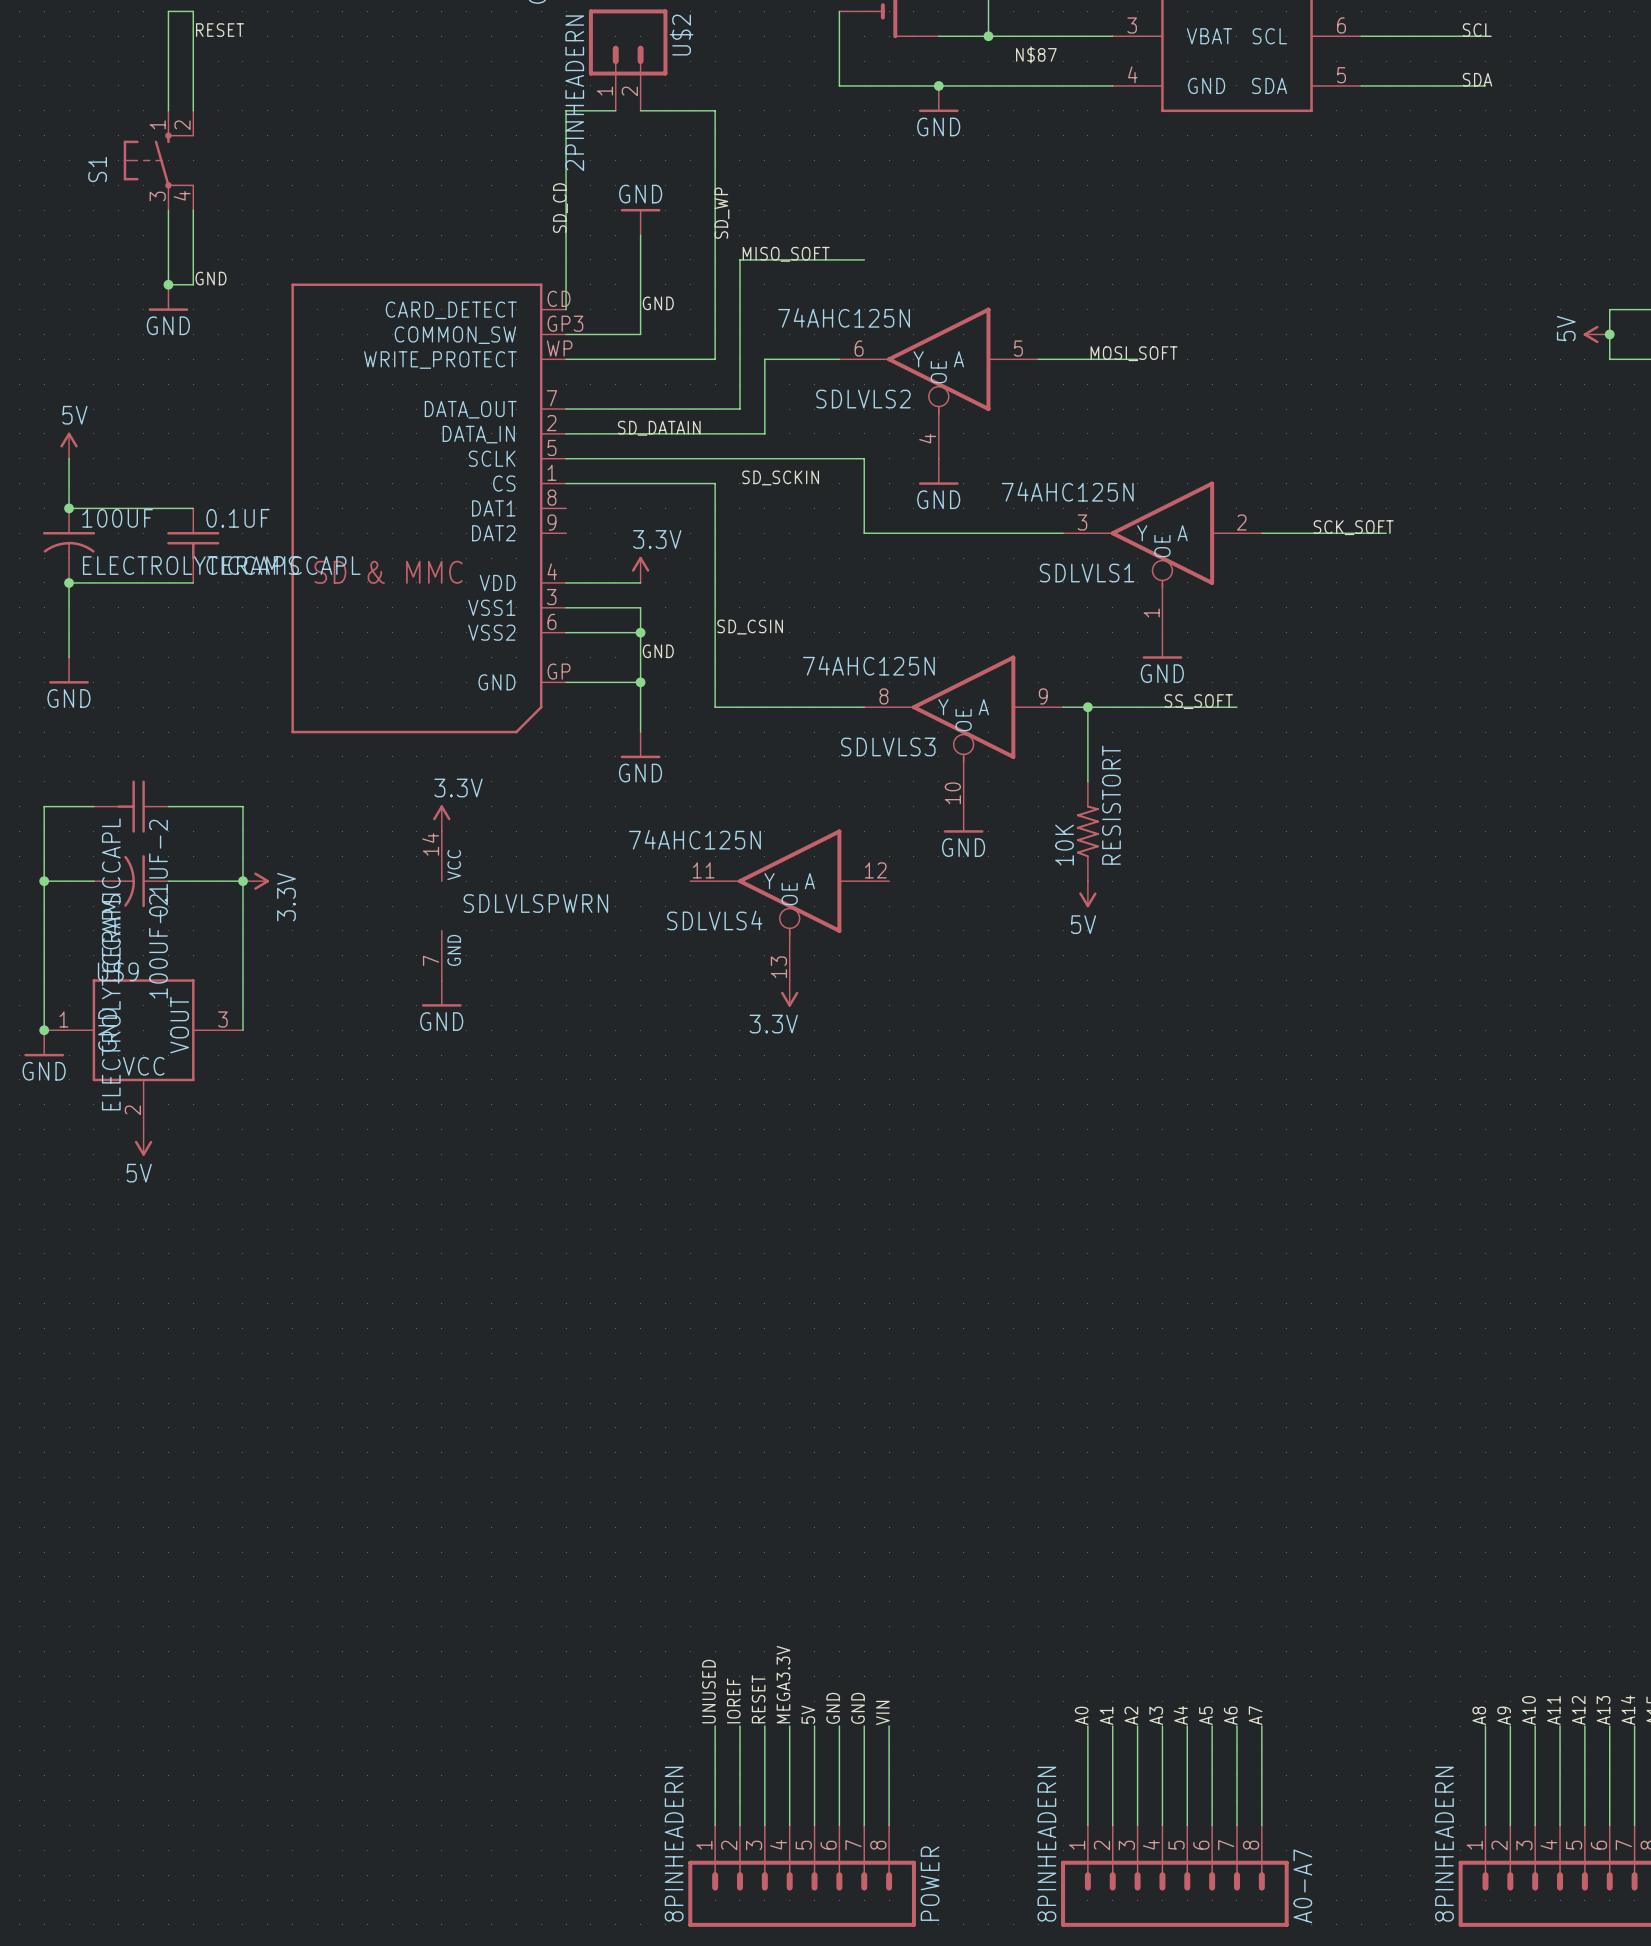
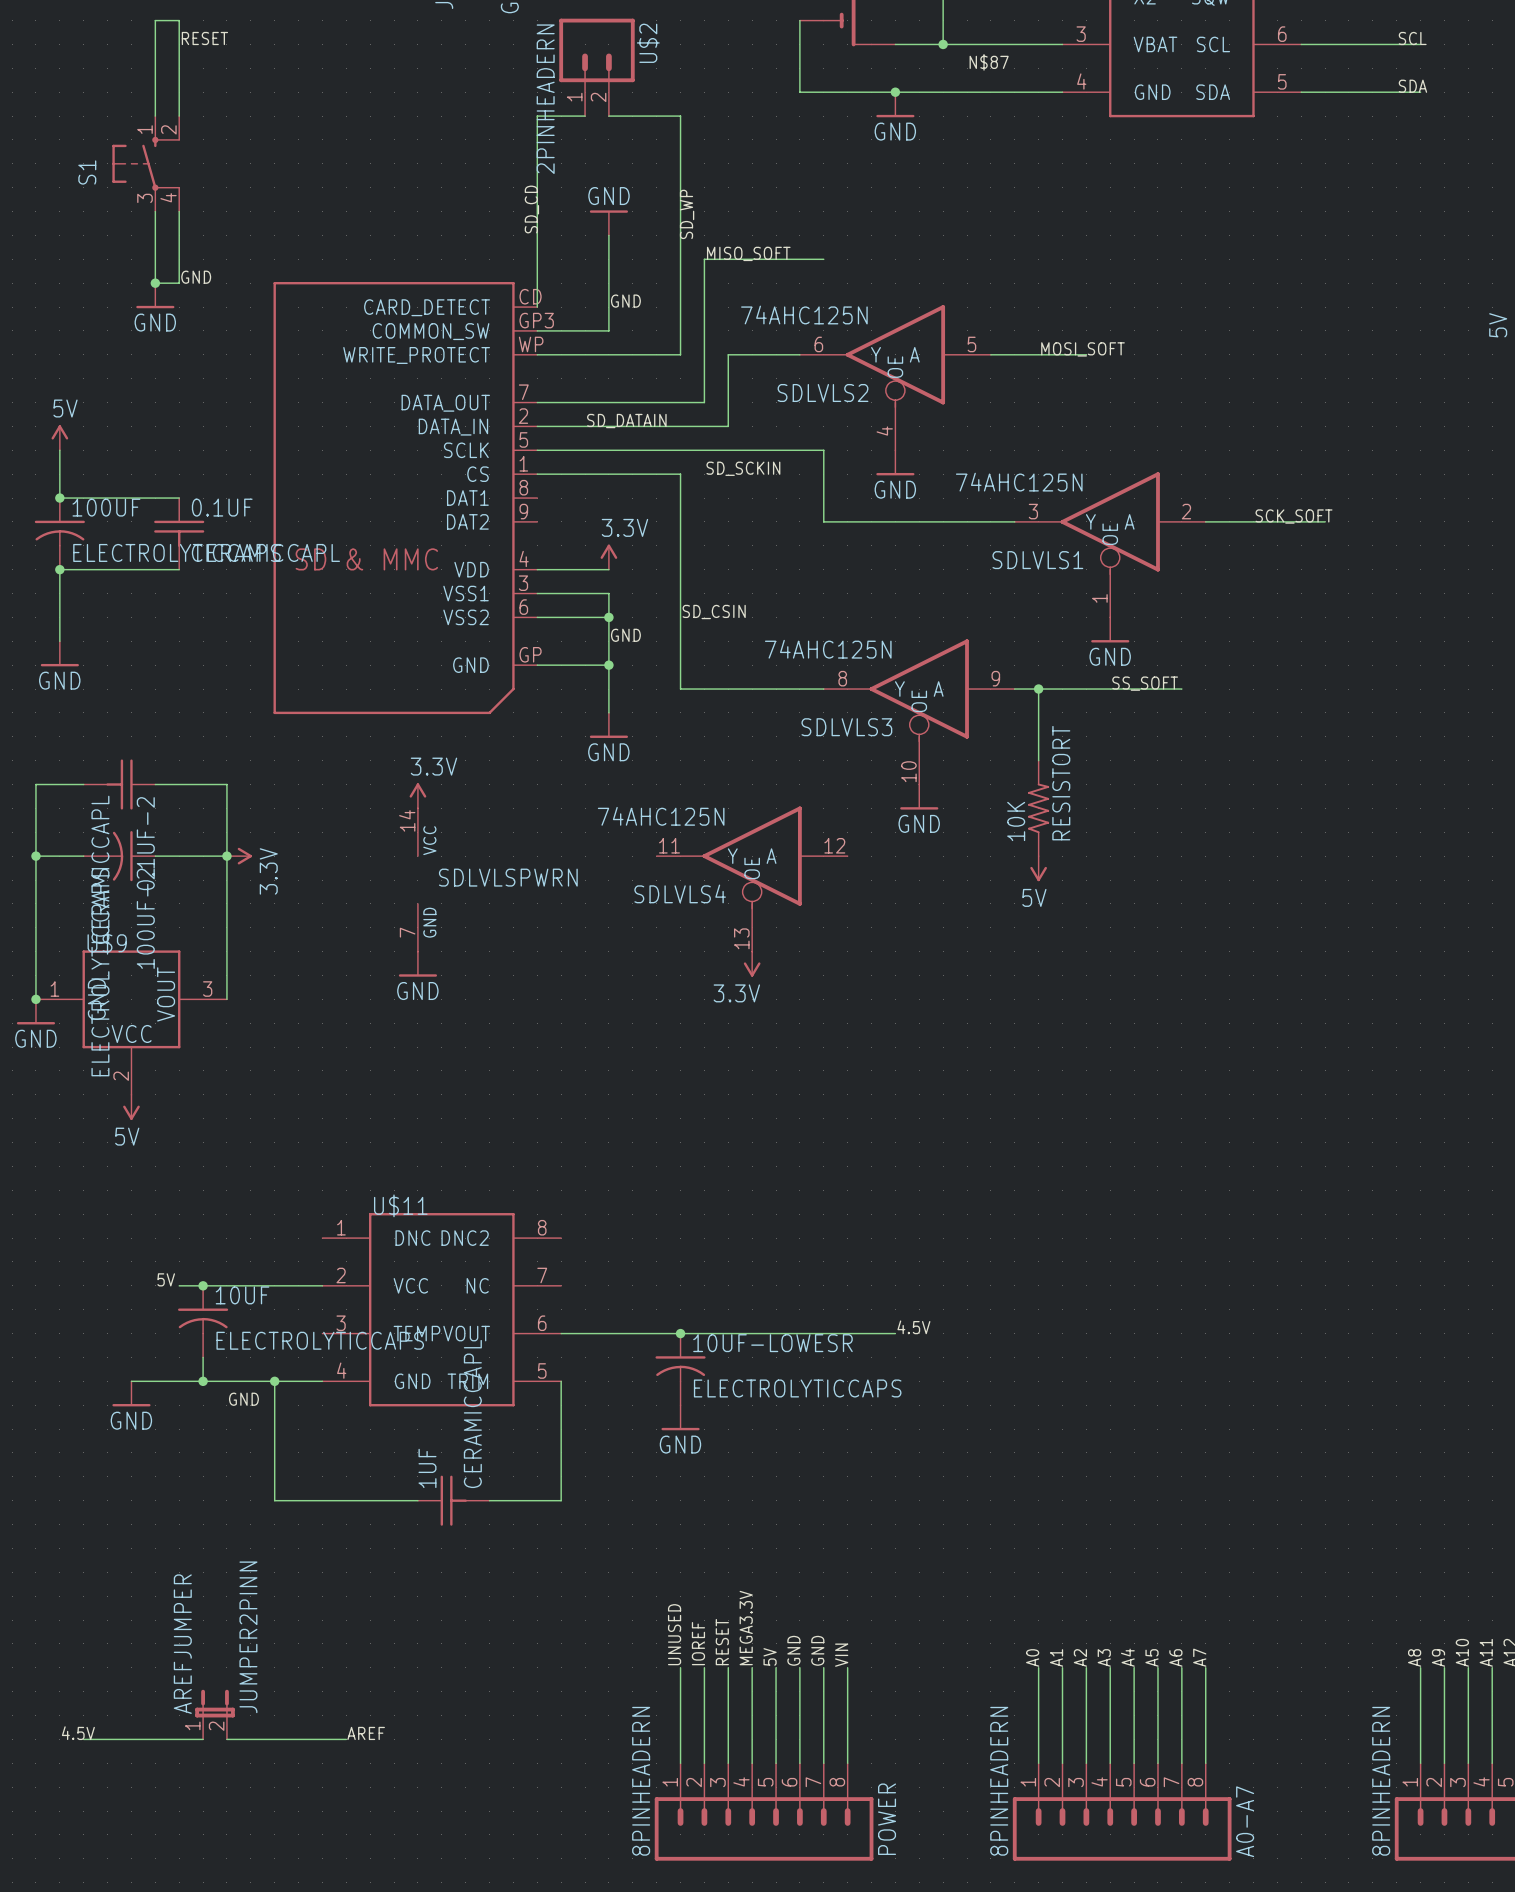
label: none -> 5V (166, 1279)
wire: none -> (179, 1285) (322, 1285)
junction: none -> (203, 1285)
U$11: none -> (441, 1309)
10UF: none -> ELECTROLYTICCAPS (203, 1321)
label: none -> 4.5V (913, 1327)
wire: none -> (561, 1333) (895, 1333)
junction: none -> (680, 1333)
wire: none -> (203, 1357) (203, 1381)
10UF-LOWESR: none -> ELECTROLYTICCAPS (680, 1369)
wire: none -> (131, 1381) (322, 1381)
junction: none -> (203, 1381)
wire: none -> (274, 1381) (274, 1500) (417, 1500)
junction: none -> (274, 1381)
wire: none -> (561, 1381) (561, 1500) (489, 1500)
power symbol: none -> GND (131, 1393)
label: none -> GND (243, 1399)
power symbol: none -> GND (680, 1417)
1UF: none -> CERAMICCAPL (453, 1500)
AREFJUMPER: none -> JUMPER2PINN (215, 1714)
label: none -> 4.5V (78, 1733)
label: none -> AREF (366, 1733)
wire: none -> (83, 1739) (203, 1739)
wire: none -> (226, 1739) (346, 1739)

